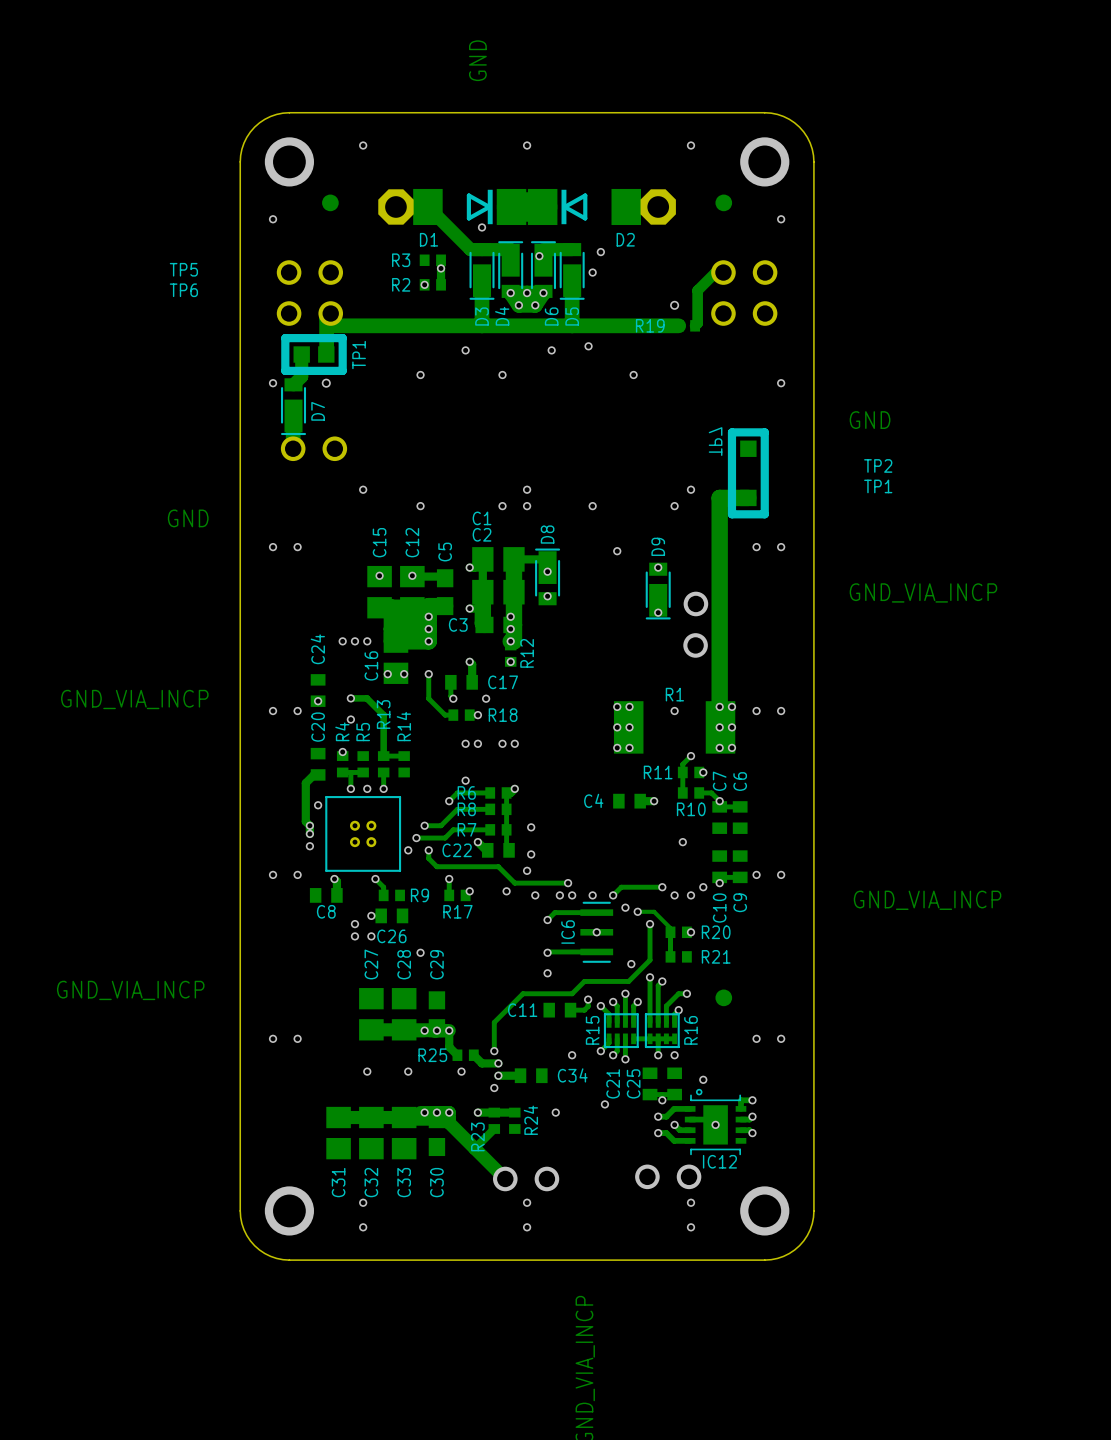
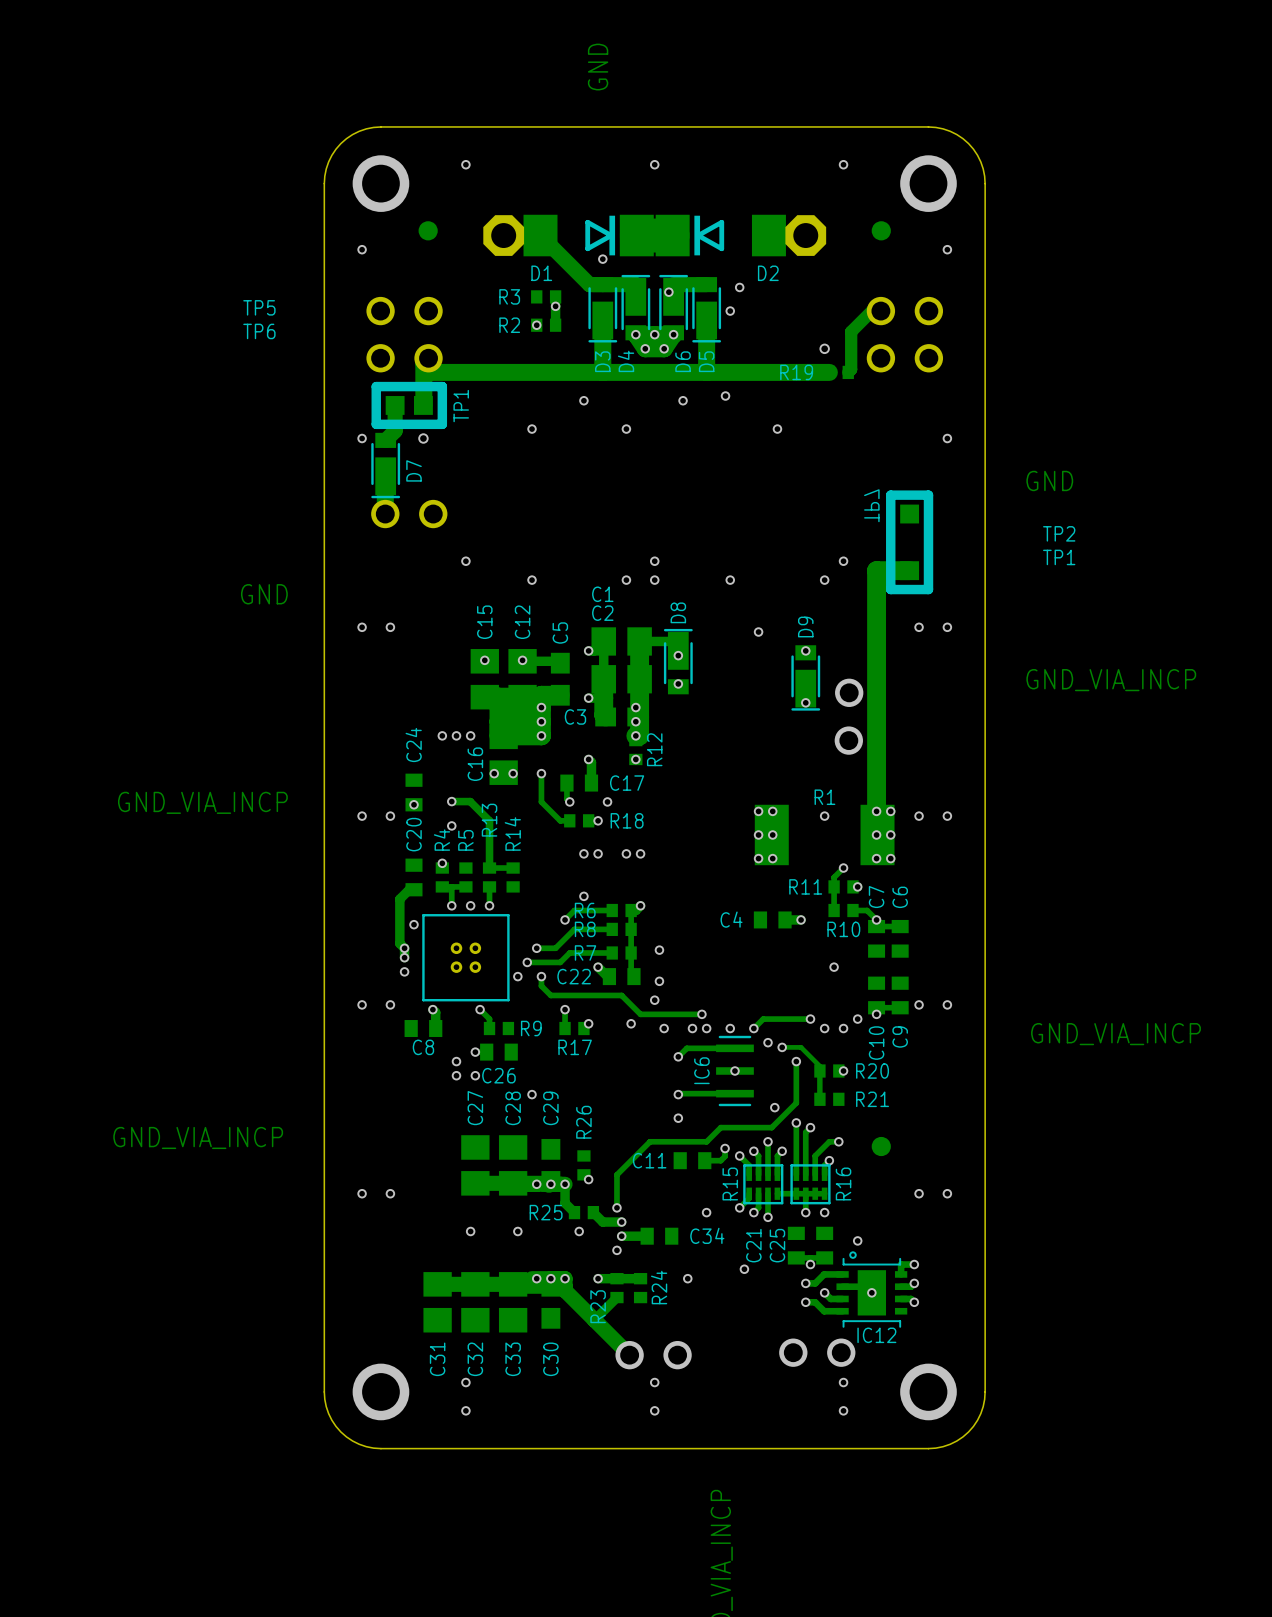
R26: none -> (583, 1165)
via: none -> (588, 1179)

